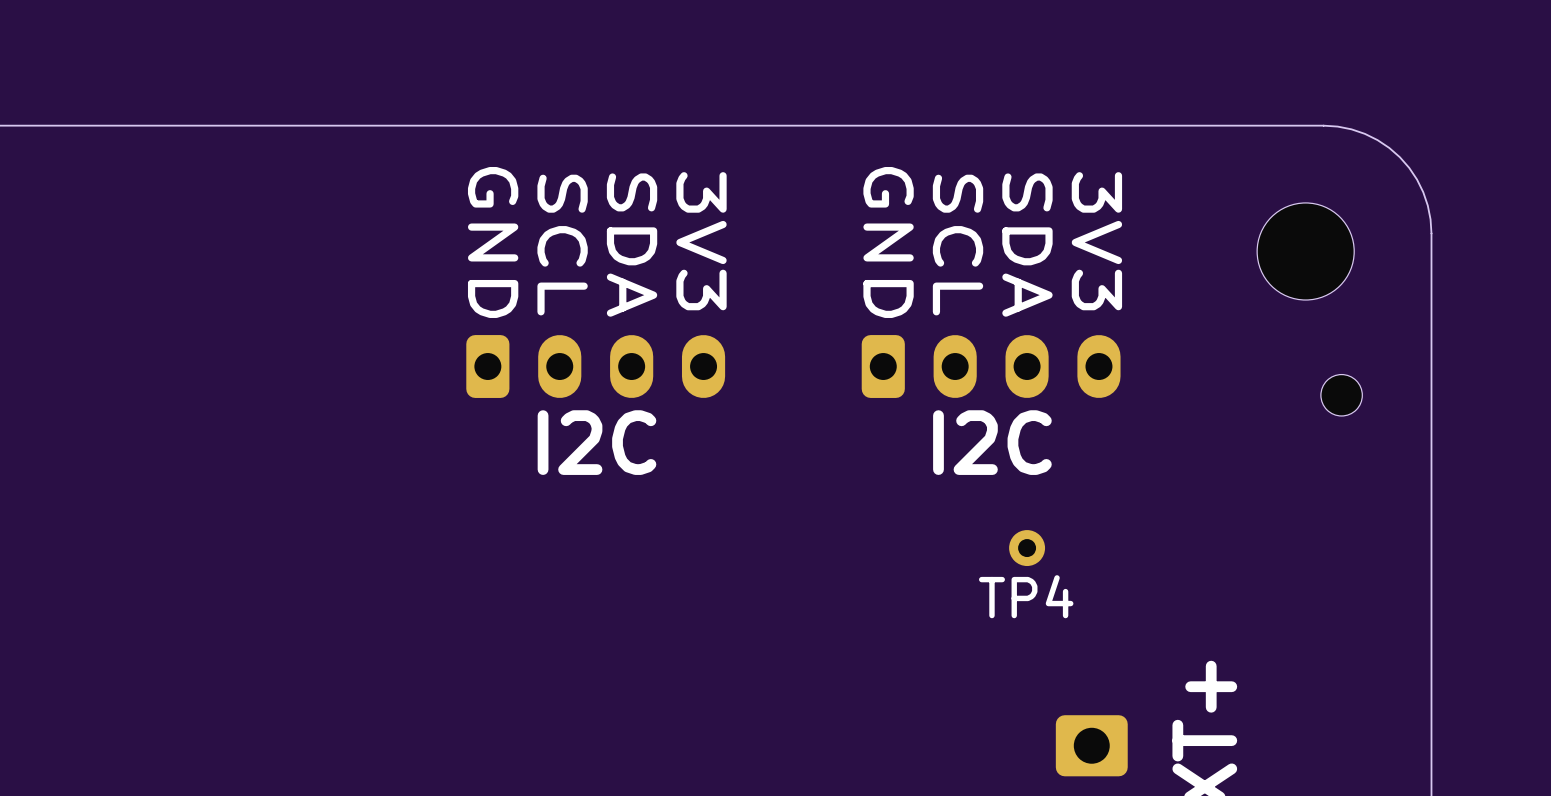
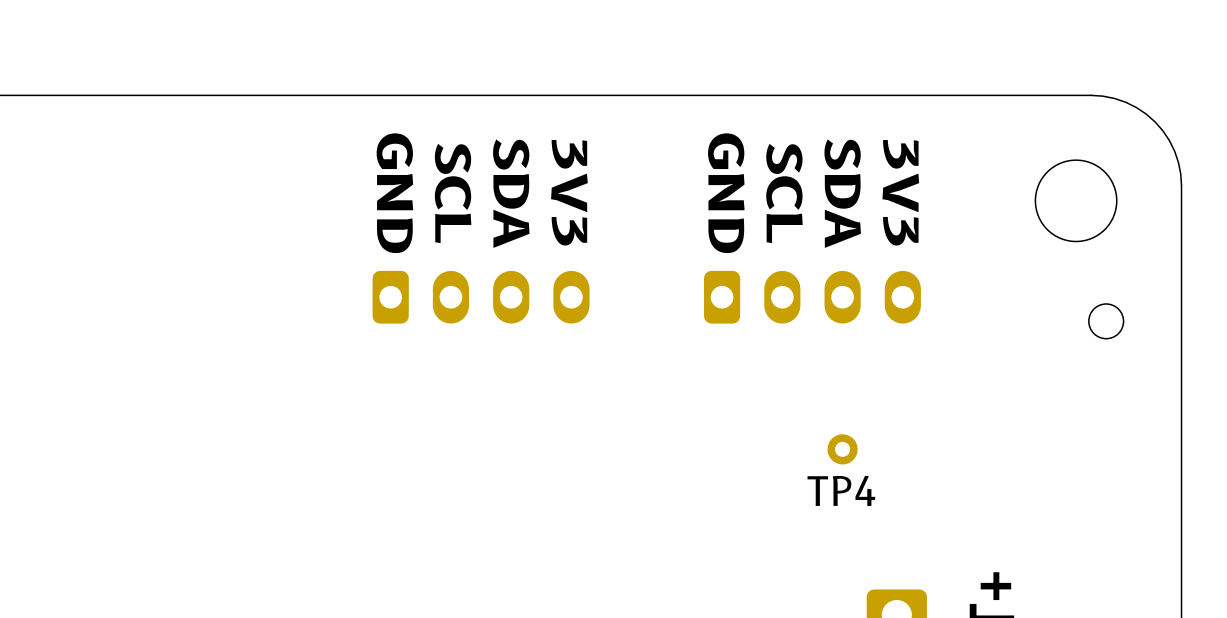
text: I2C (596, 442) -> none
text: I2C (992, 442) -> none

